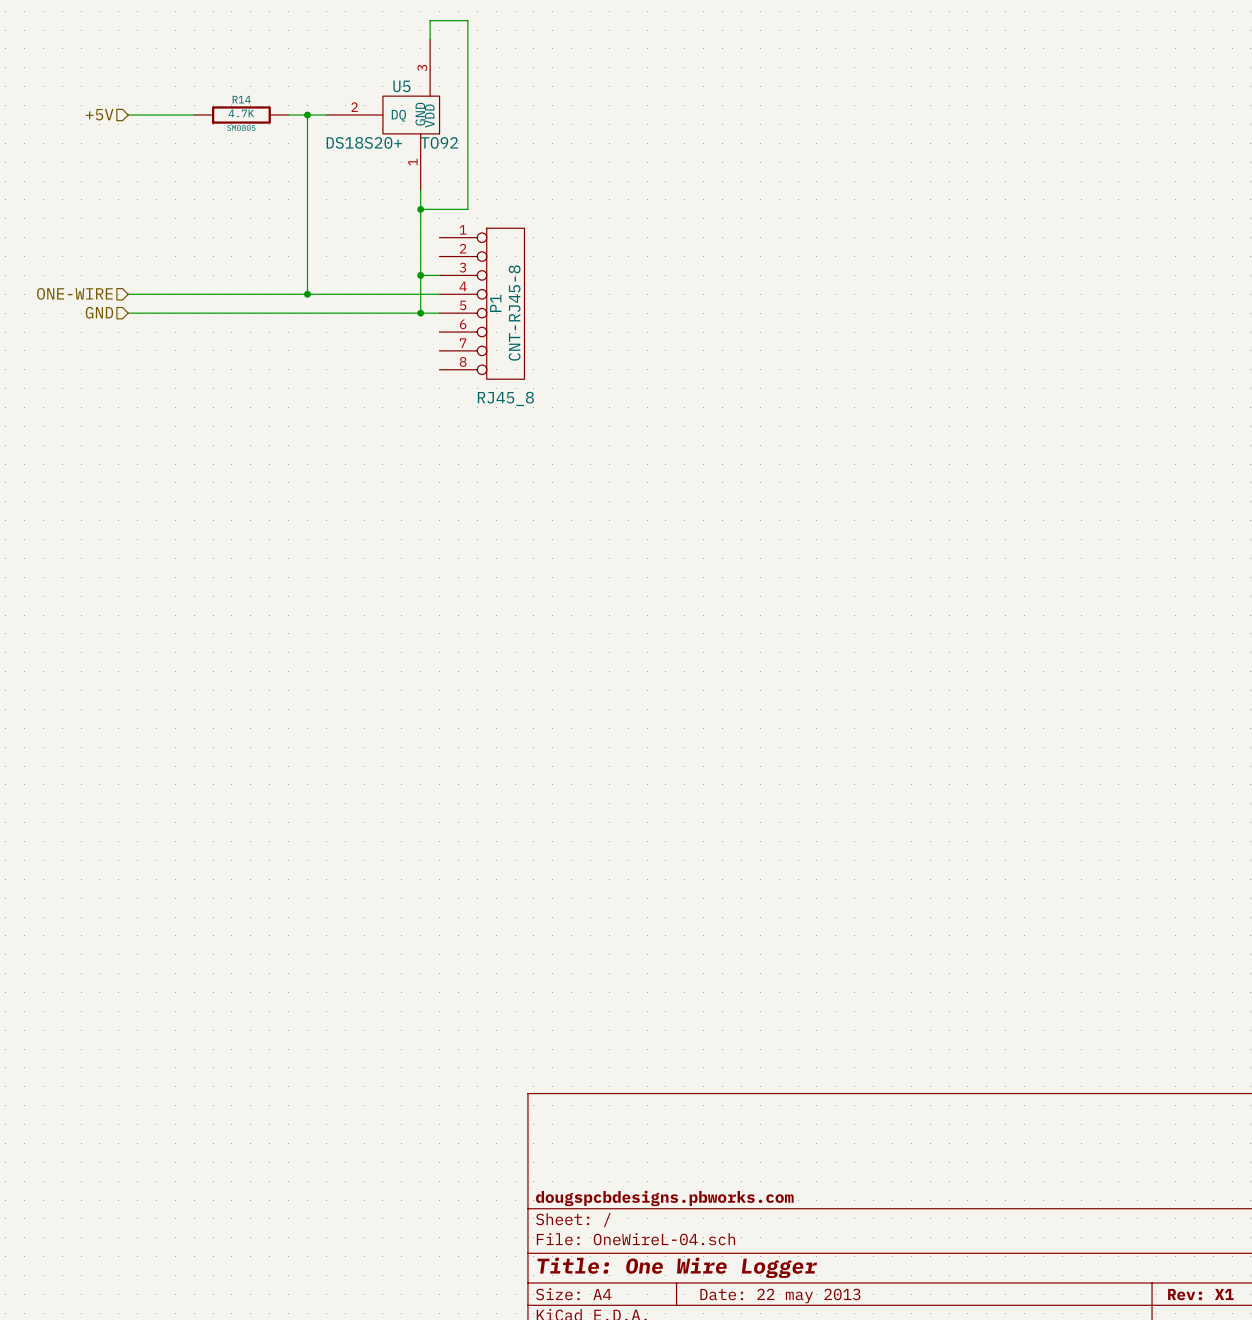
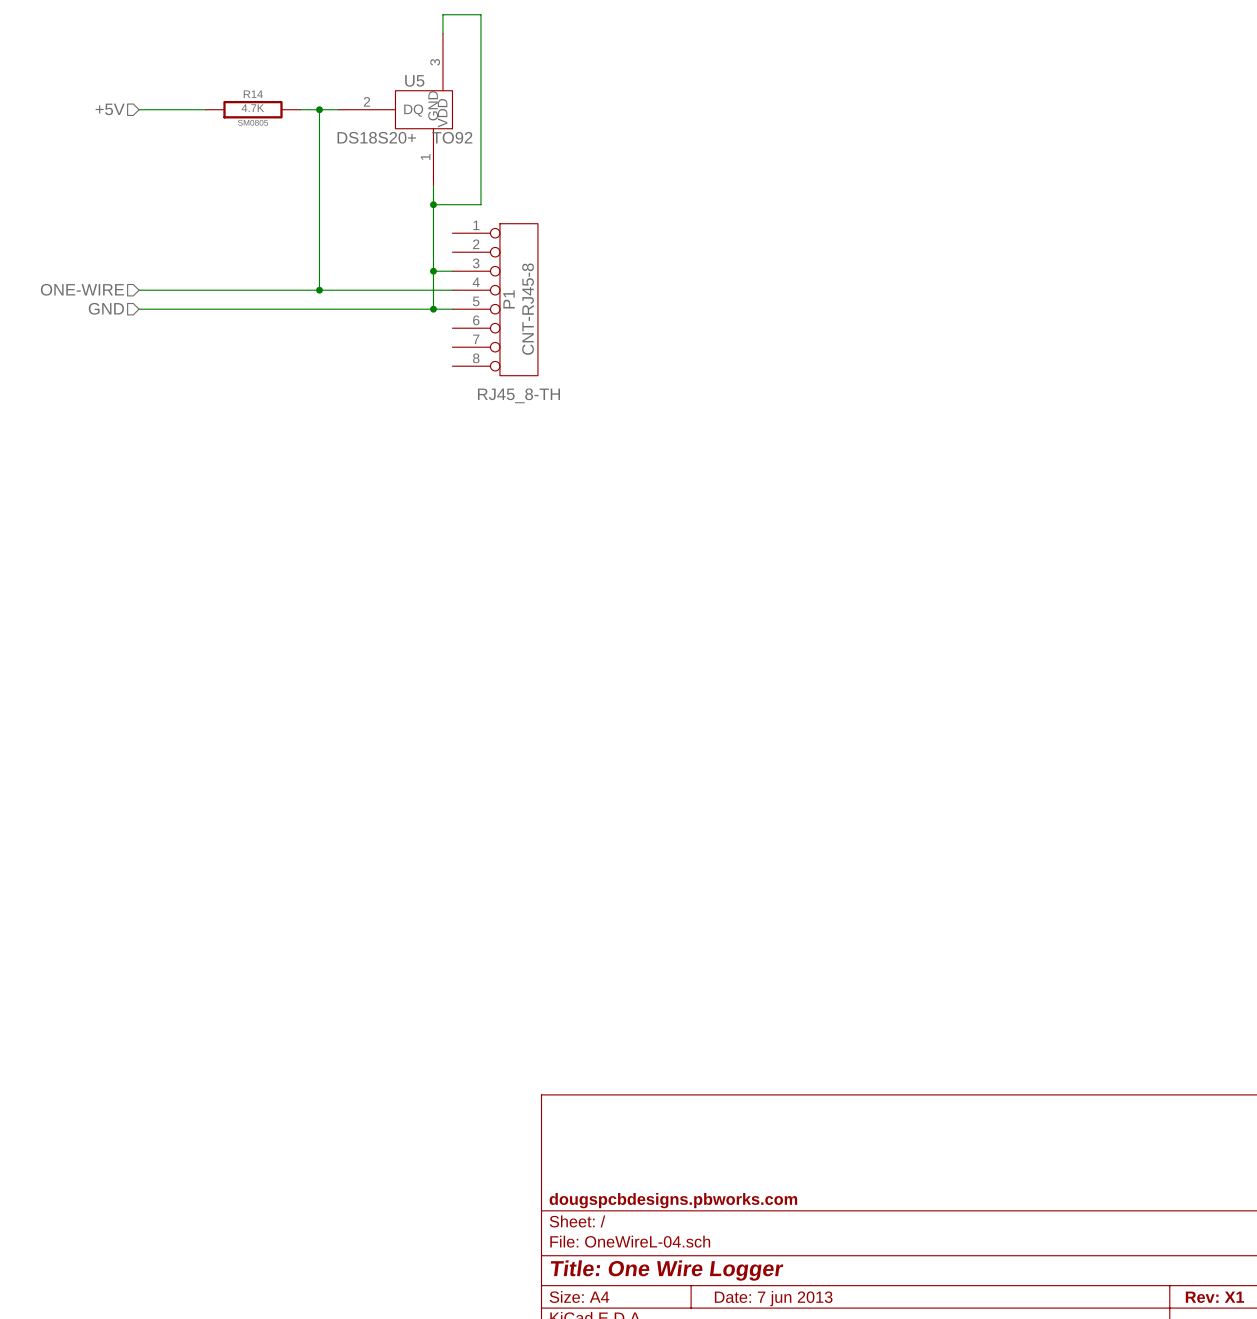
P1 text: RJ45_8 (505, 398) -> RJ45_8-TH (518, 395)
title block: Date: 22 may 2013 (780, 1295) -> Date: 7 jun 2013 (773, 1298)

